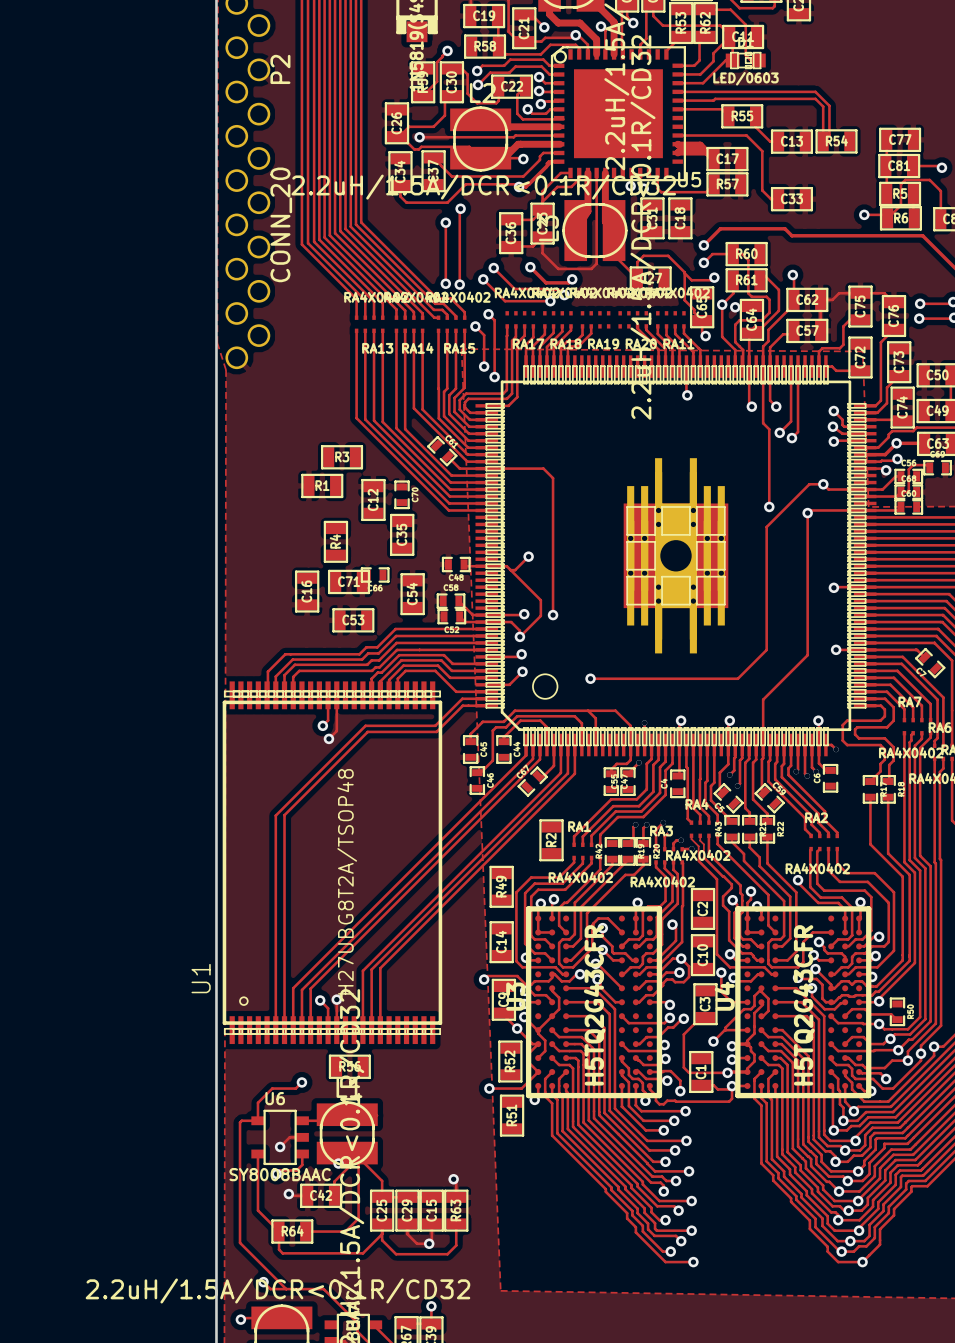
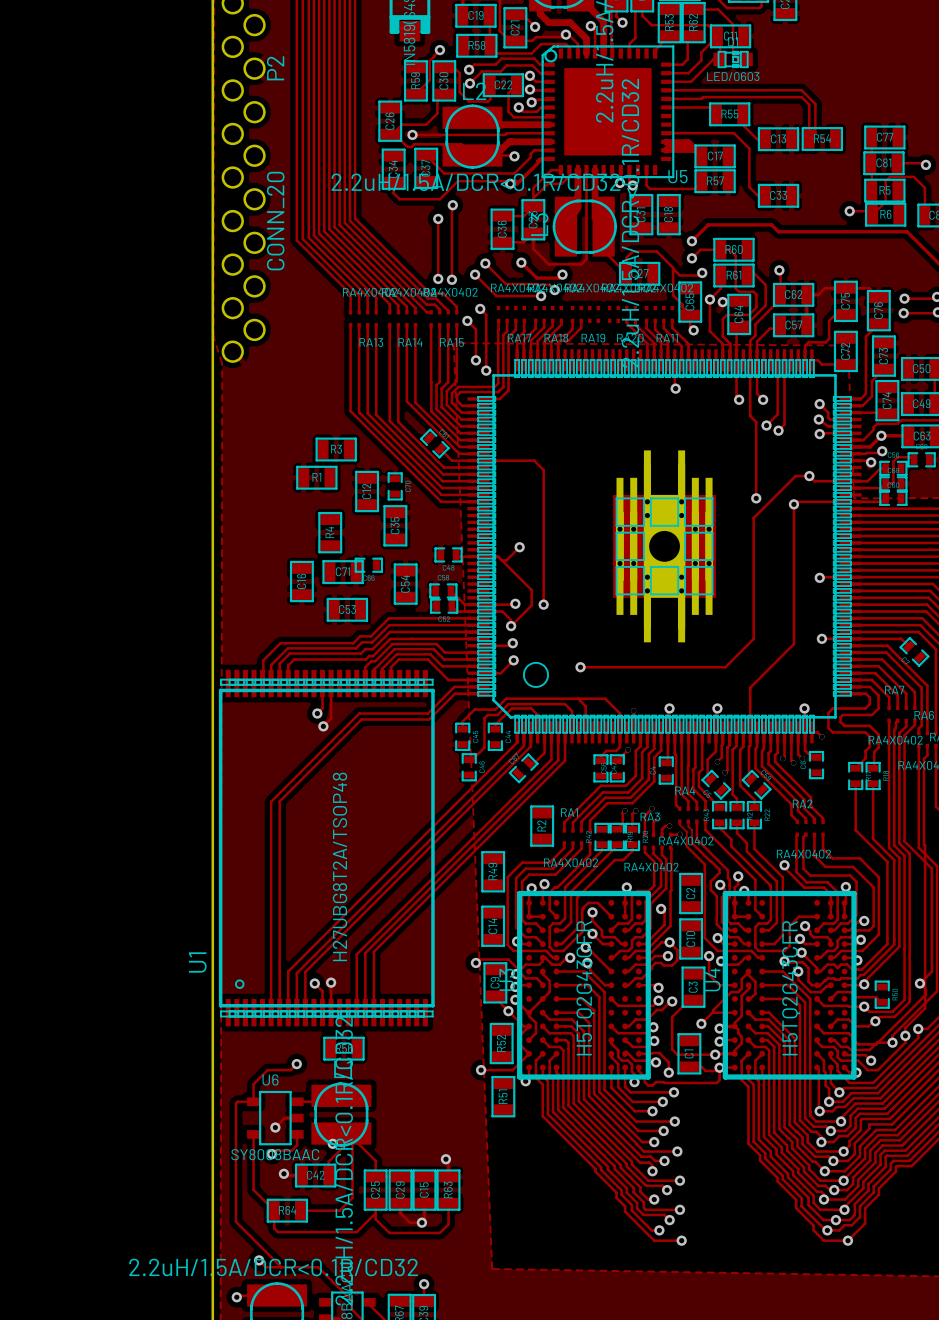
track: (935, 863) (935, 1023) (907, 1051) (907, 1053) -> (919, 848) (937, 866) (937, 991) (892, 1035)
track: (930, 866) (930, 1021) (898, 1050) (863, 1051) -> (914, 851) (931, 868) (931, 971) (919, 983) (925, 989) (925, 994) (876, 1044) (858, 1044) (848, 1033)
via position: (898, 1050) -> (919, 983)

